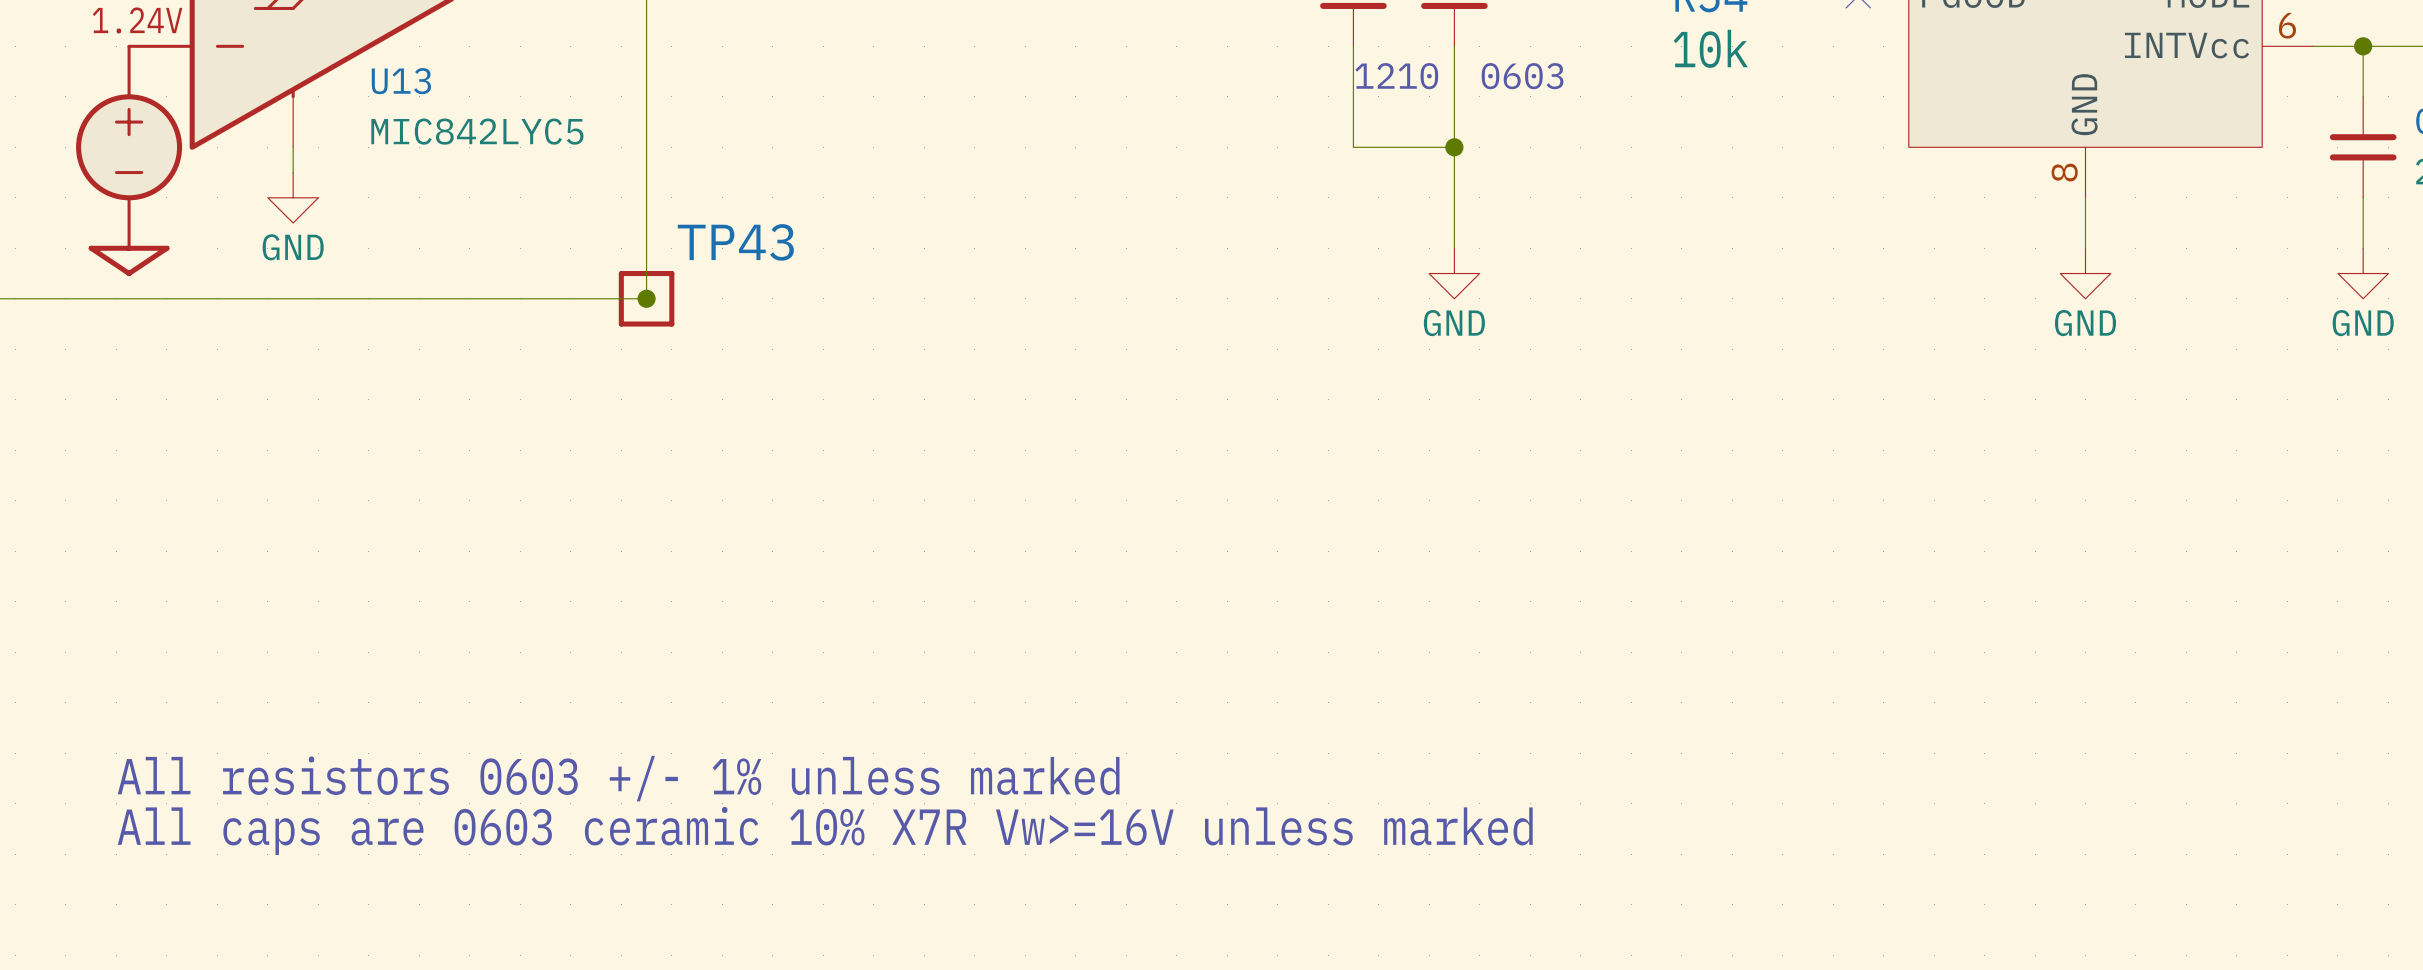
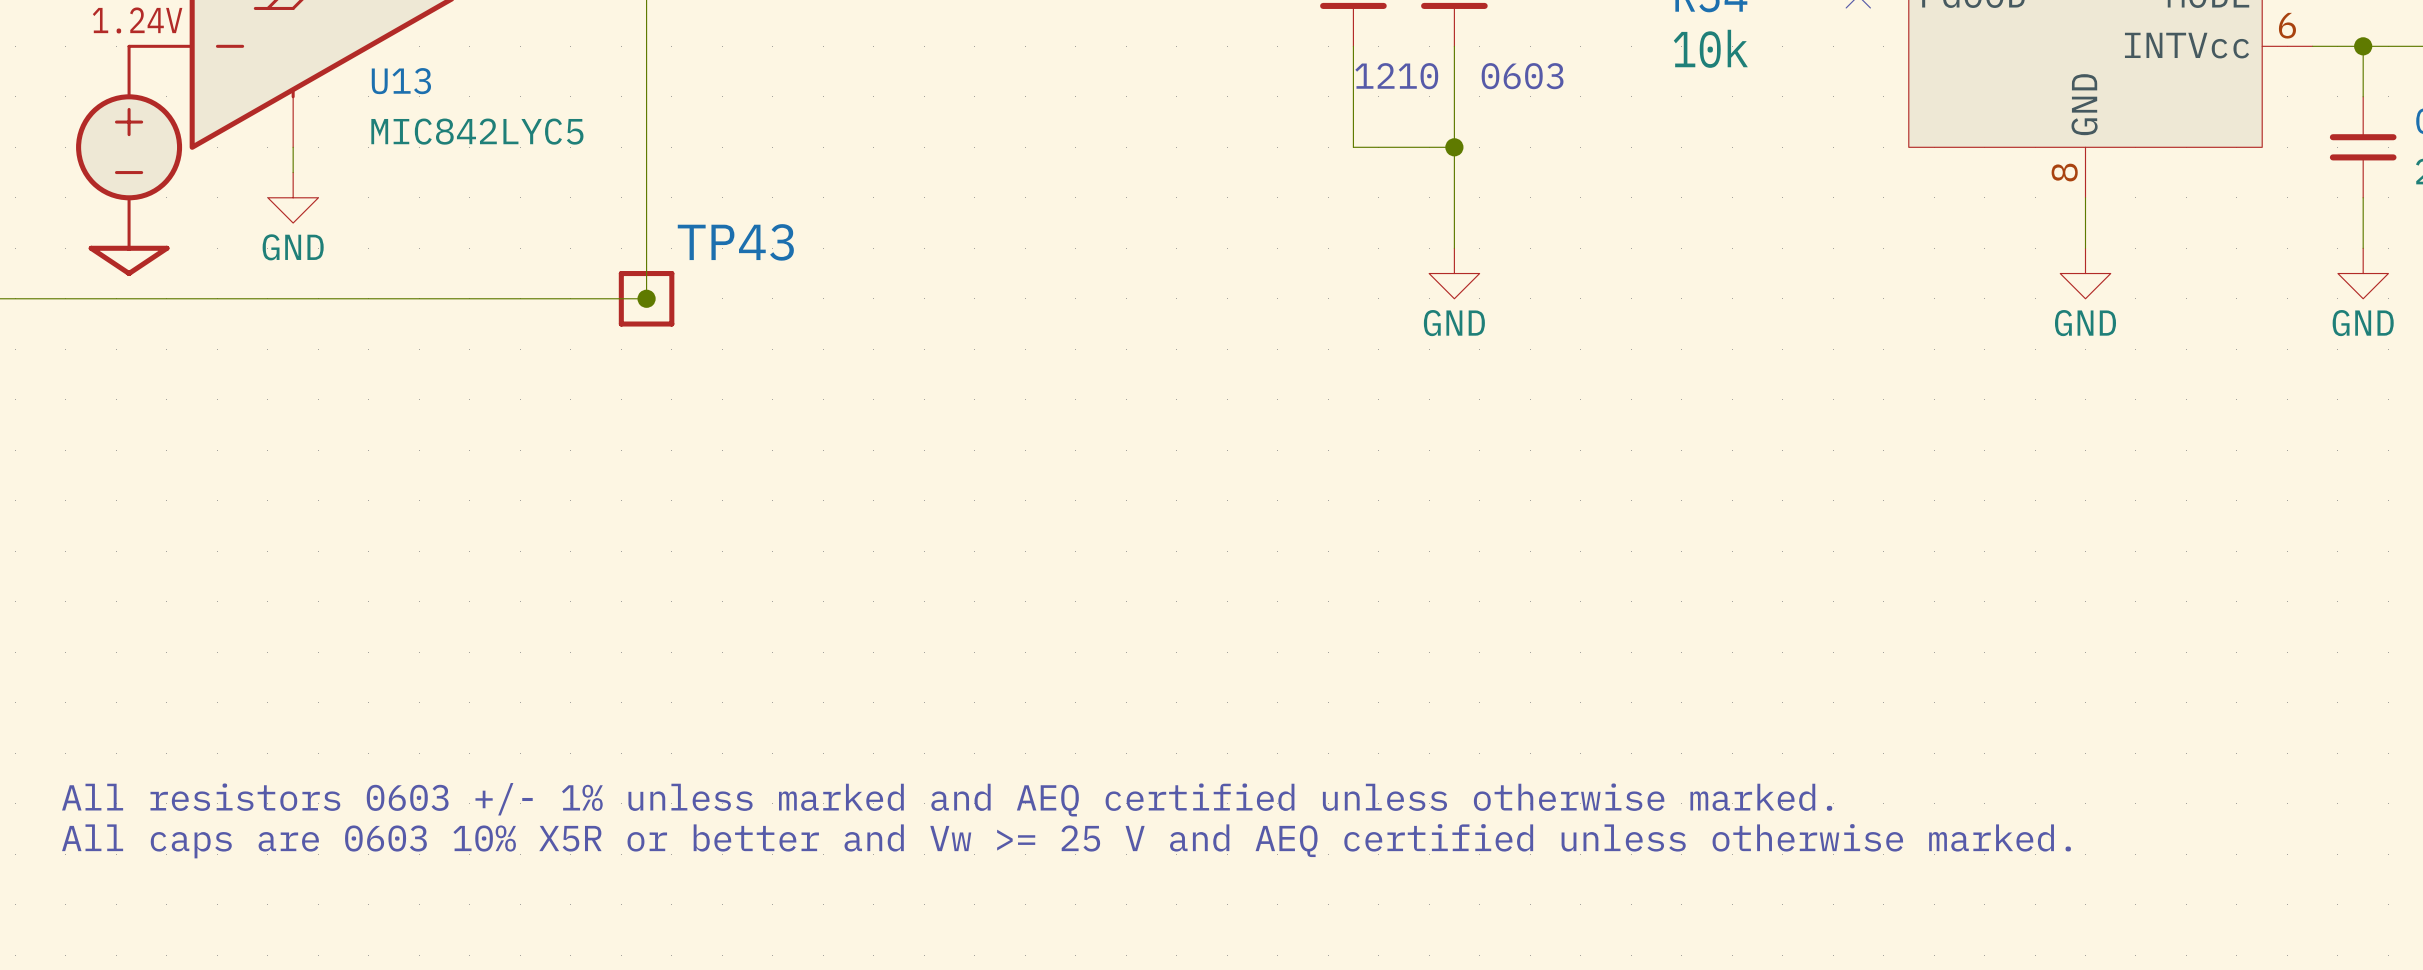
text: All resistors 0603 +/- 1% unless marked (618, 778) -> All resistors 0603 +/- 1% unless marked and AEQ certified unless otherwise marked. (947, 799)
text: All caps are 0603 ceramic 10% X7R Vw>=16V unless marked (825, 830) -> none
text: none -> All caps are 0603 10% X5R or better and Vw >= 25 V and AEQ certified unless otherwise marked. (1066, 841)

